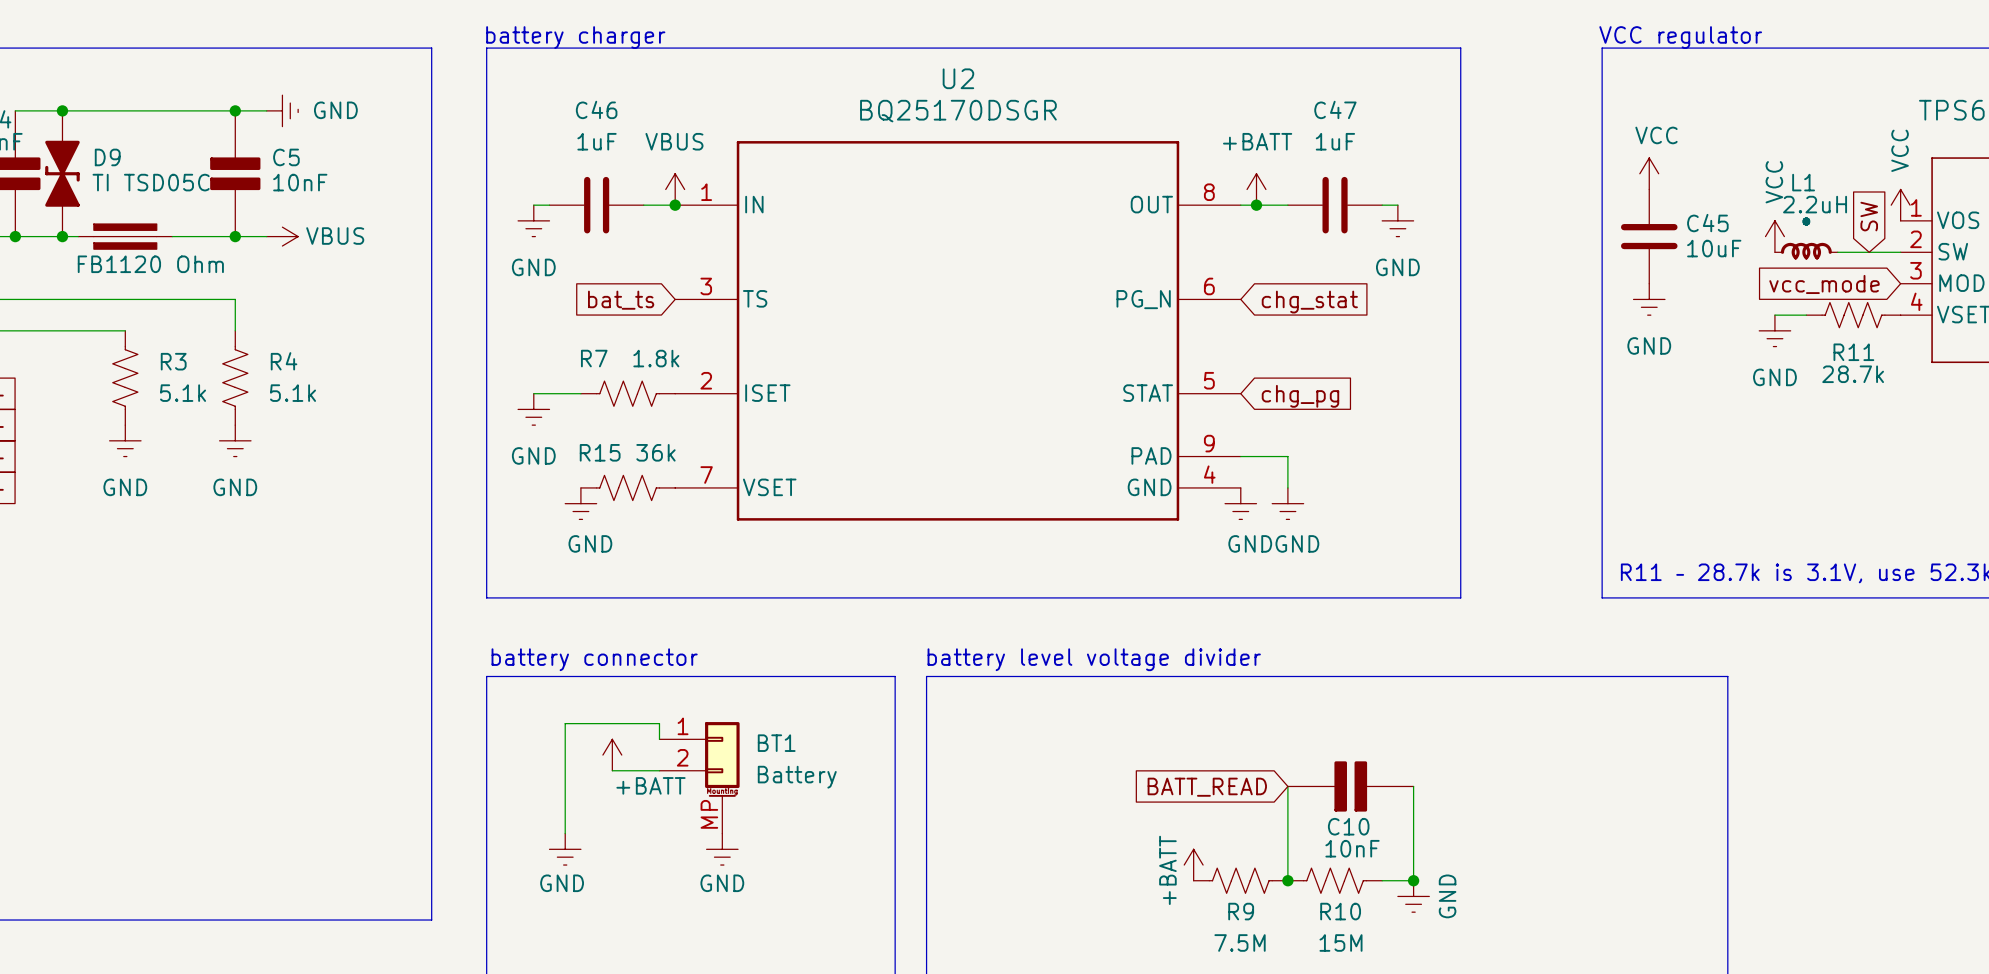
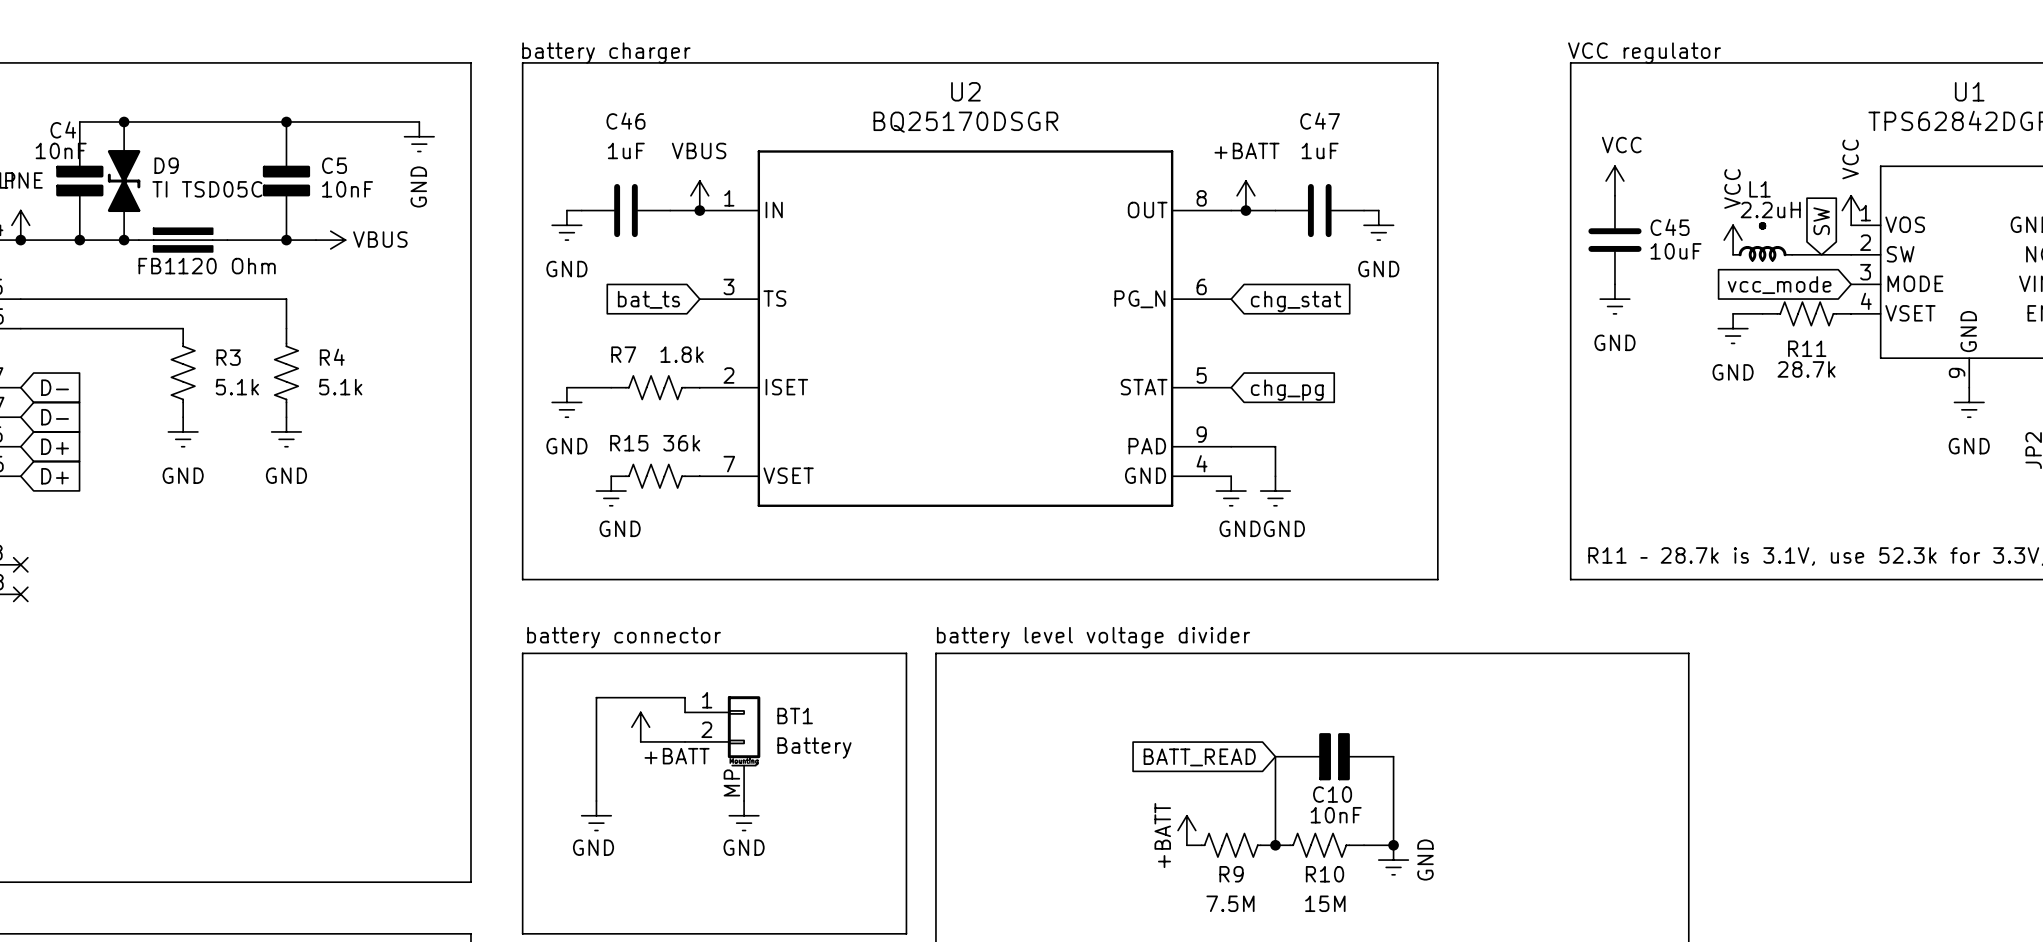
wire: none -> (315, 121) (419, 121)
power symbol rotation: 0° (282, 110) -> 90° clockwise (419, 136)
power symbol position: GND (282, 110) -> GND (419, 136)

